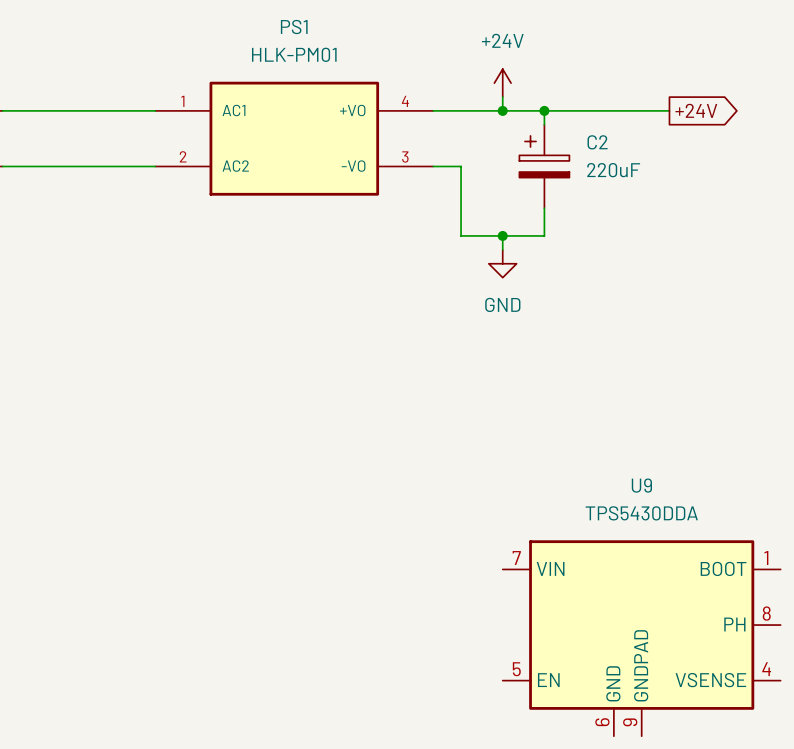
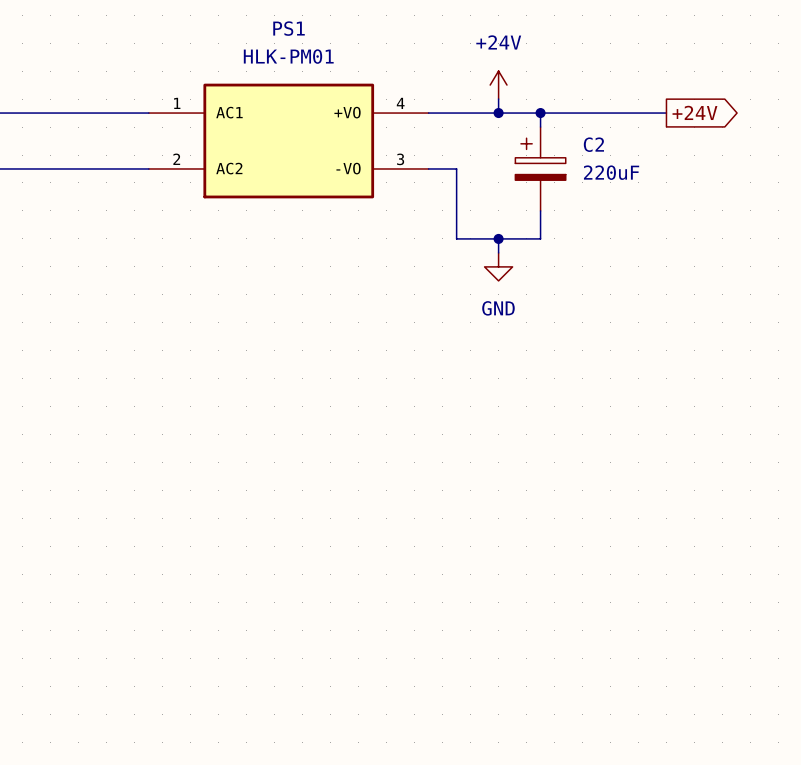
U9: TPS5430DDA (641, 638) -> none

